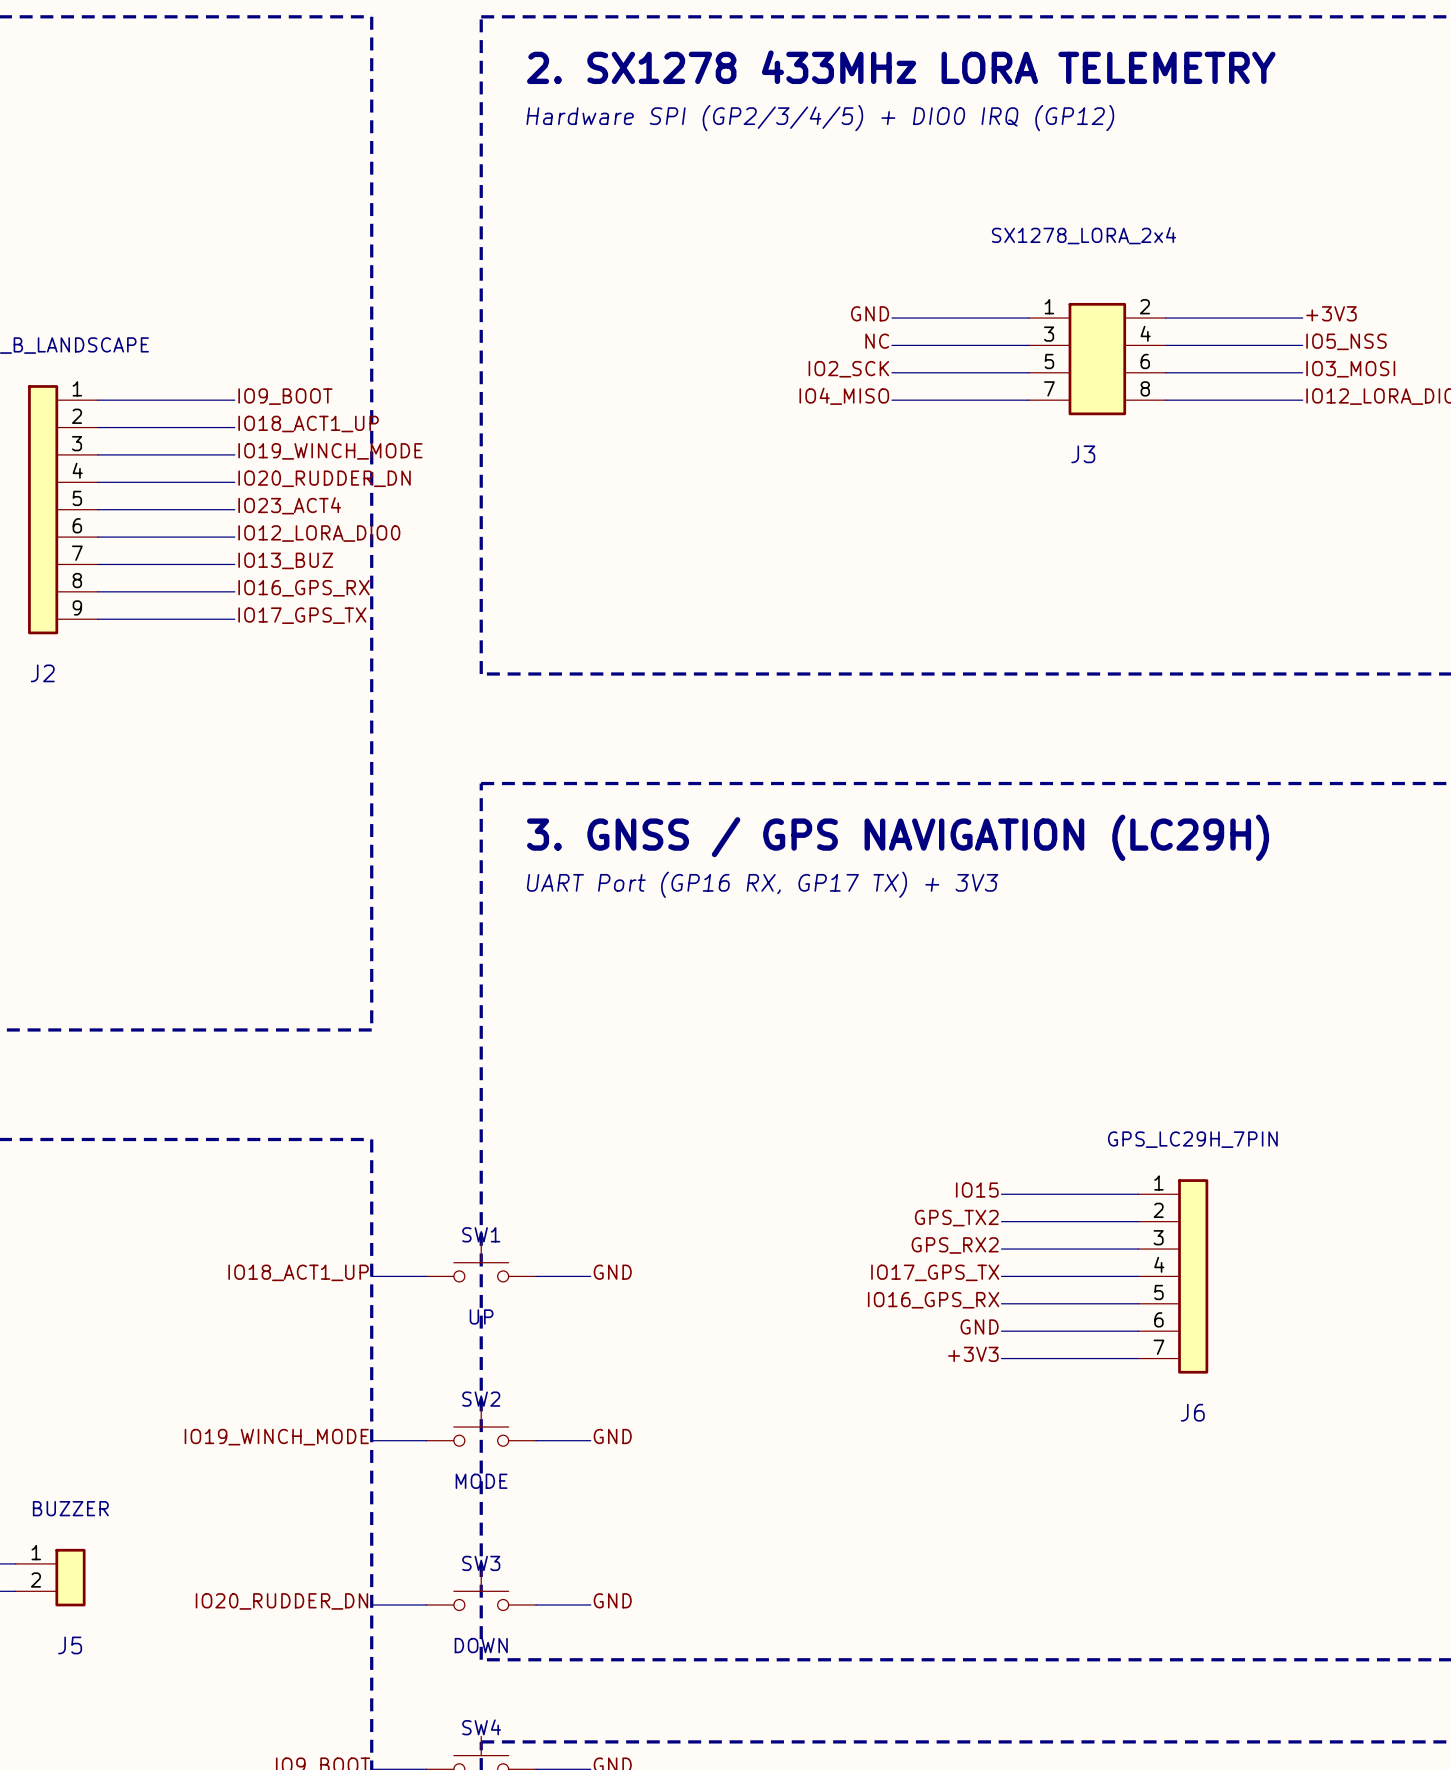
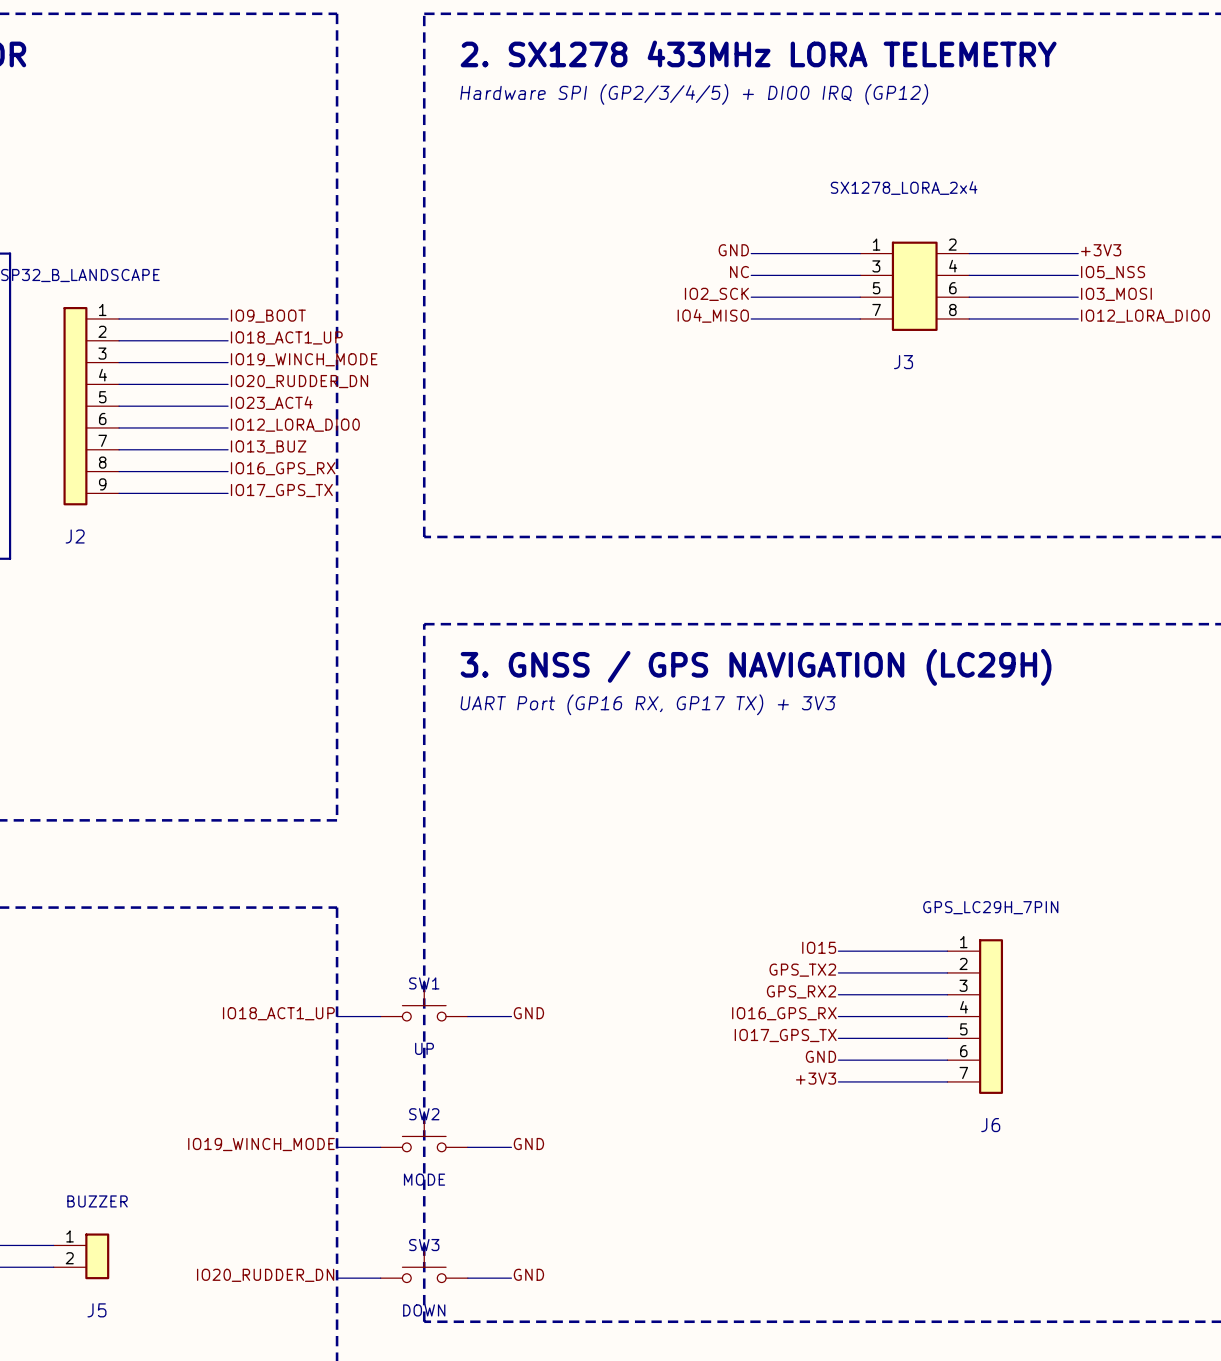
label: IO17_GPS_TX (935, 1272) -> IO16_GPS_RX (784, 1013)
label: IO16_GPS_RX (933, 1300) -> IO17_GPS_TX (785, 1035)

